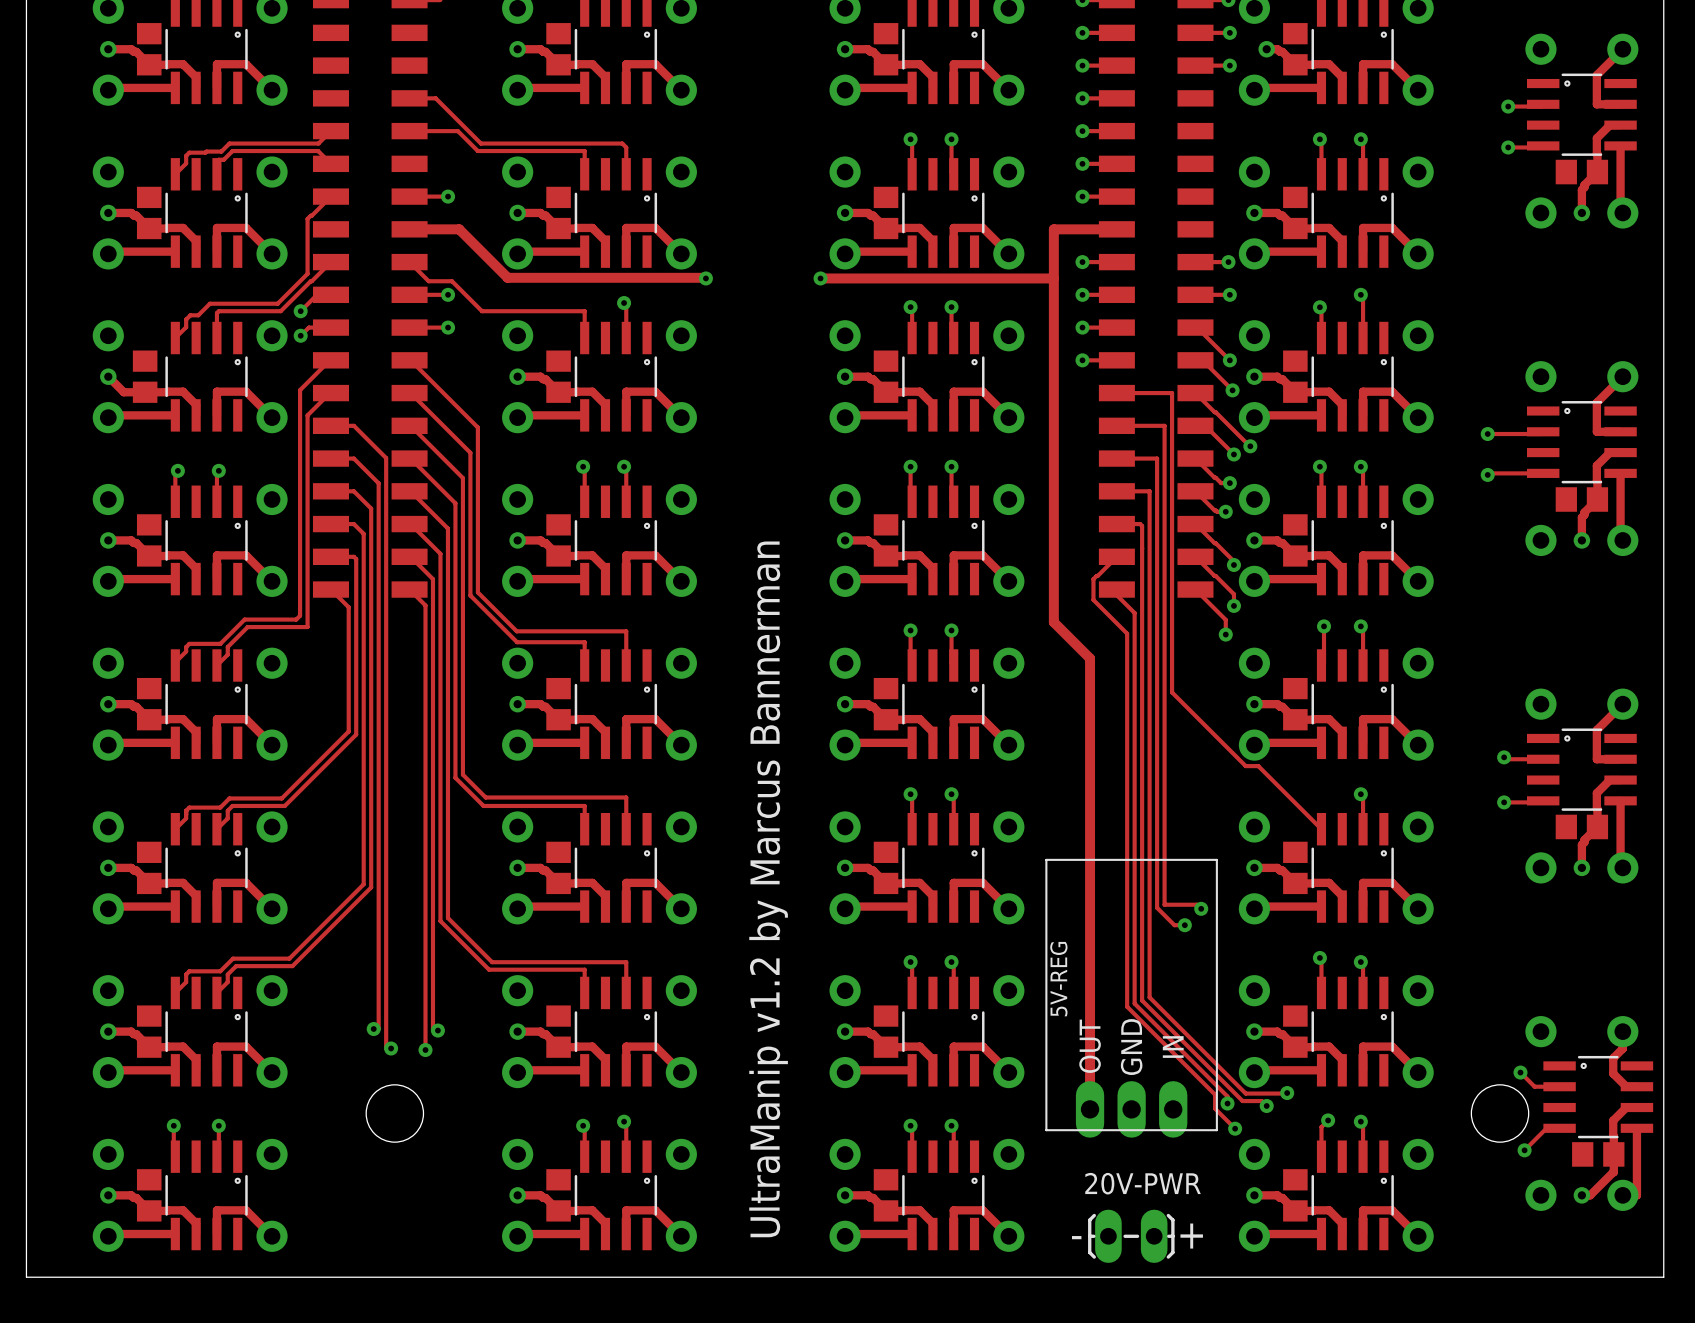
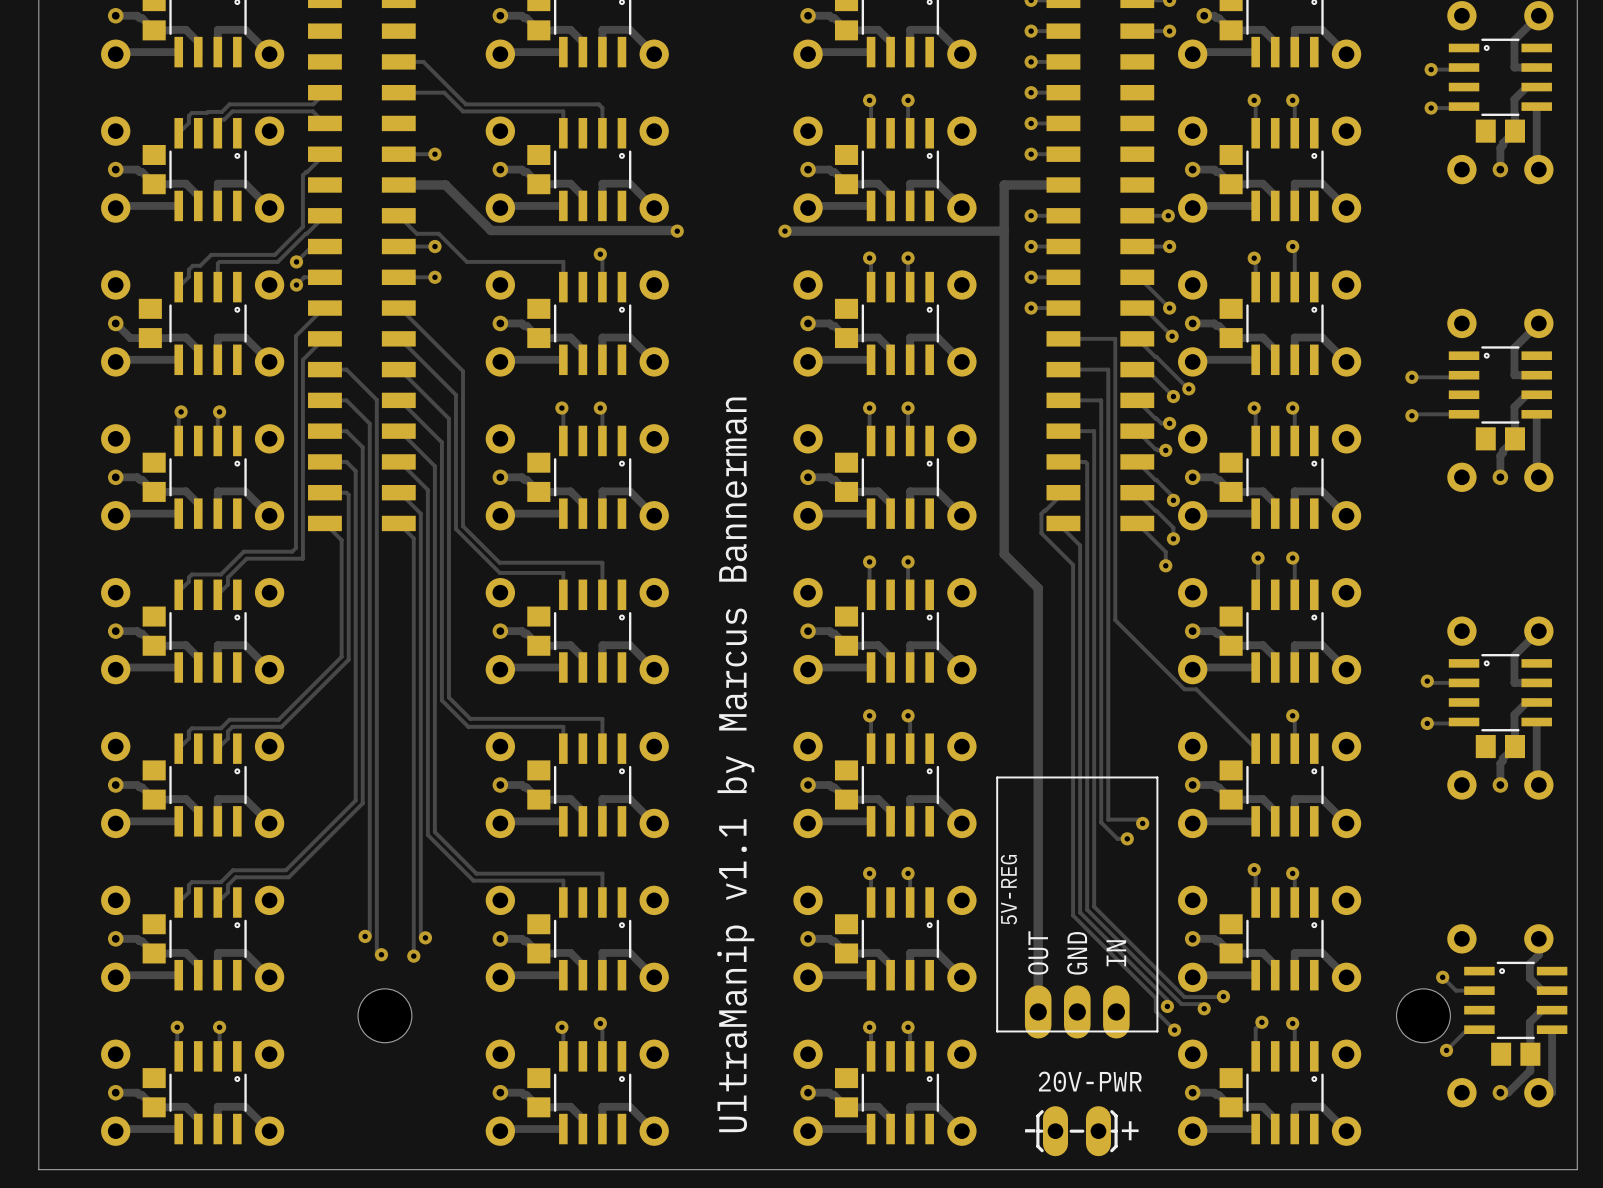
text: UltraManip v1.2 by Marcus Bannerman (768, 889) -> UltraManip v1.1 by Marcus Bannerman (735, 764)

